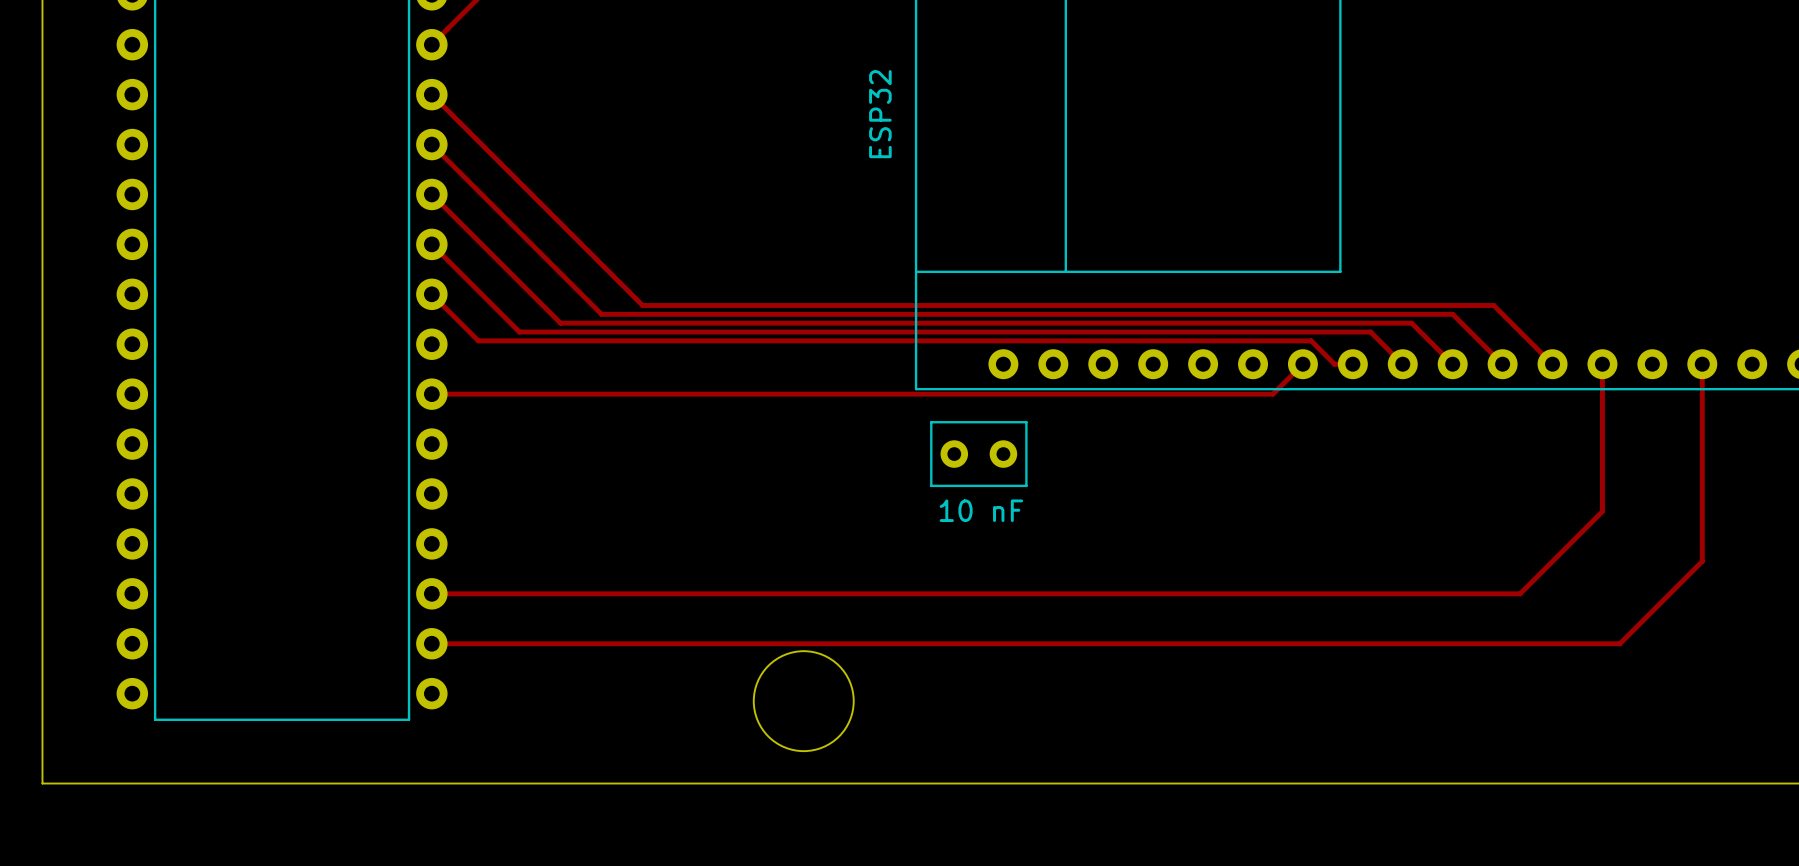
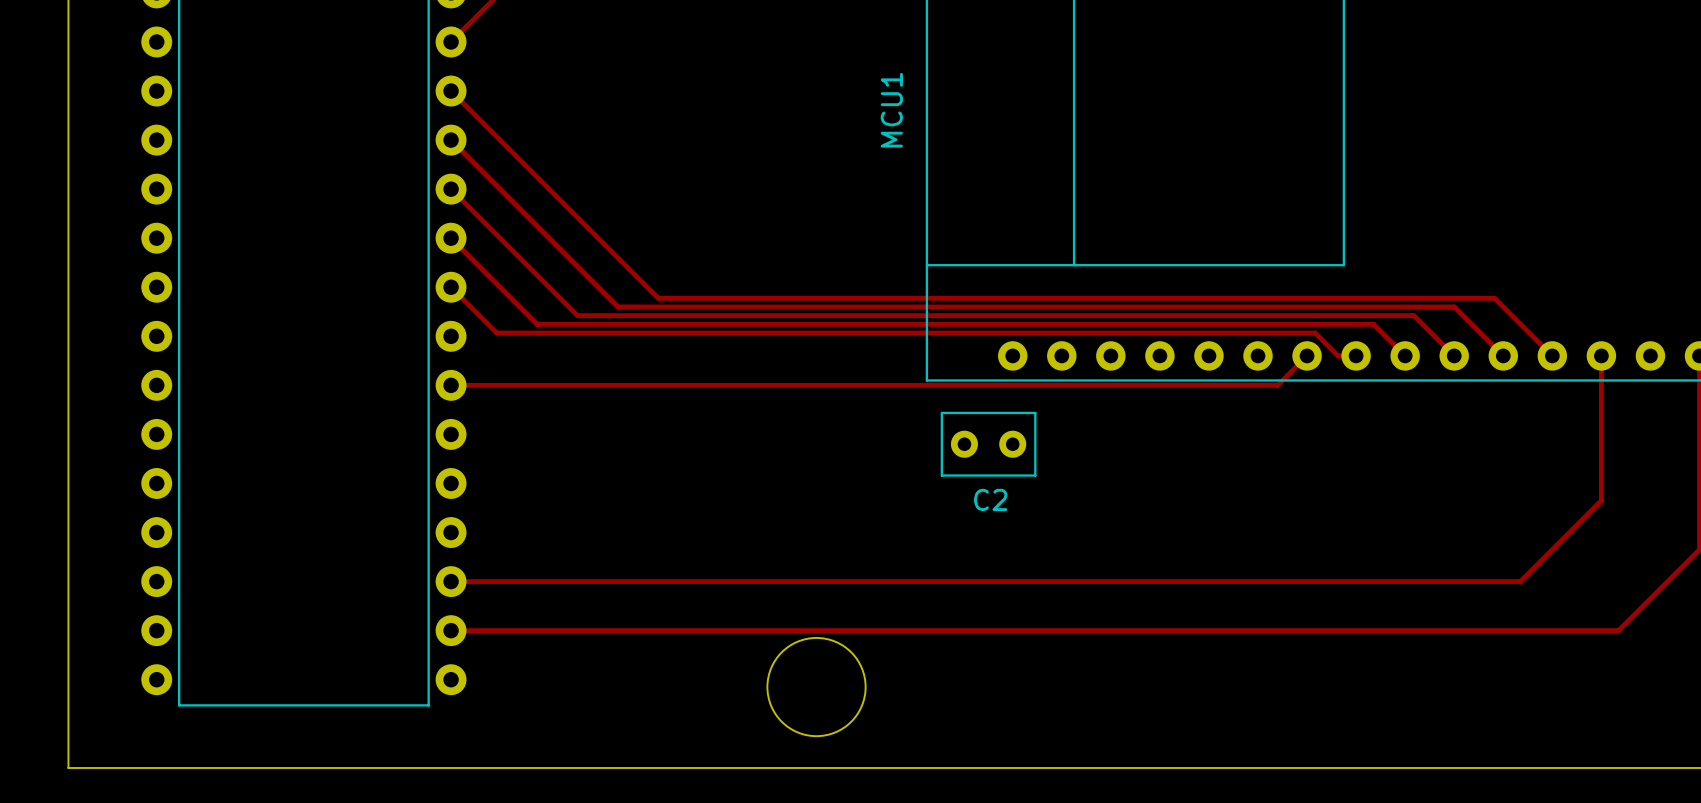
ESP32 name: ESP32 (880, 114) -> MCU1 (891, 110)
10 nF name: 10 nF (981, 510) -> C2 (990, 499)

